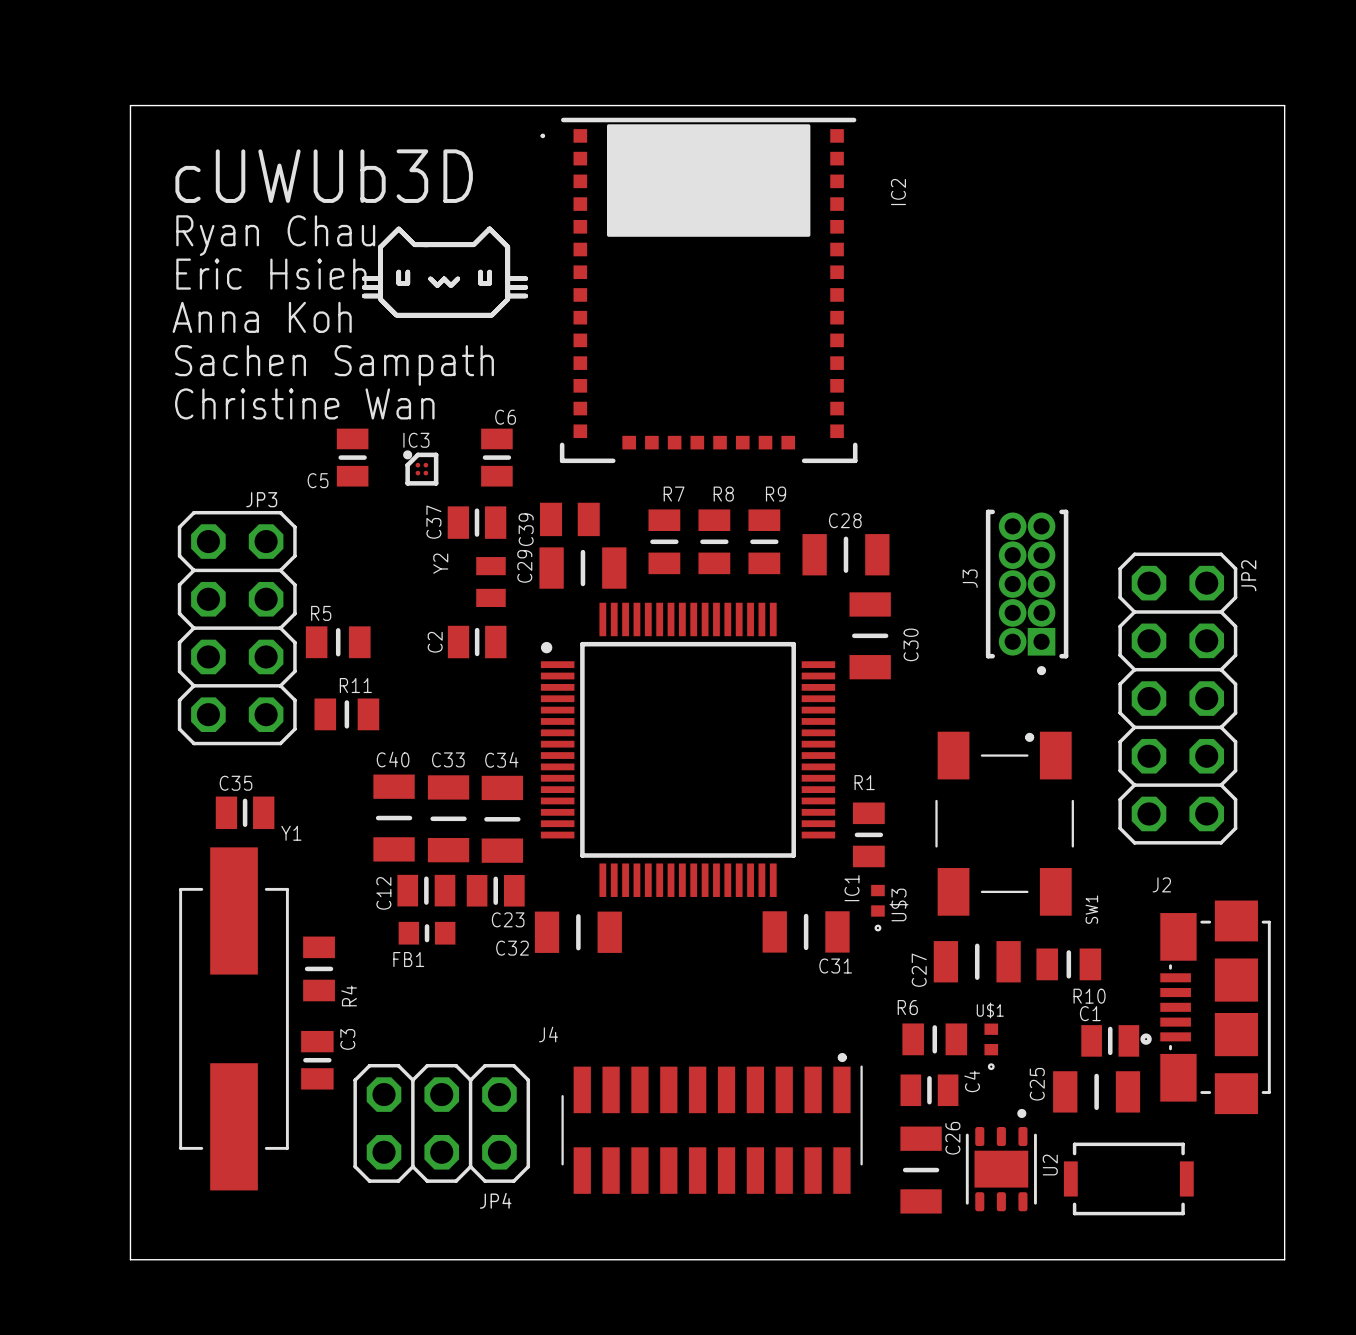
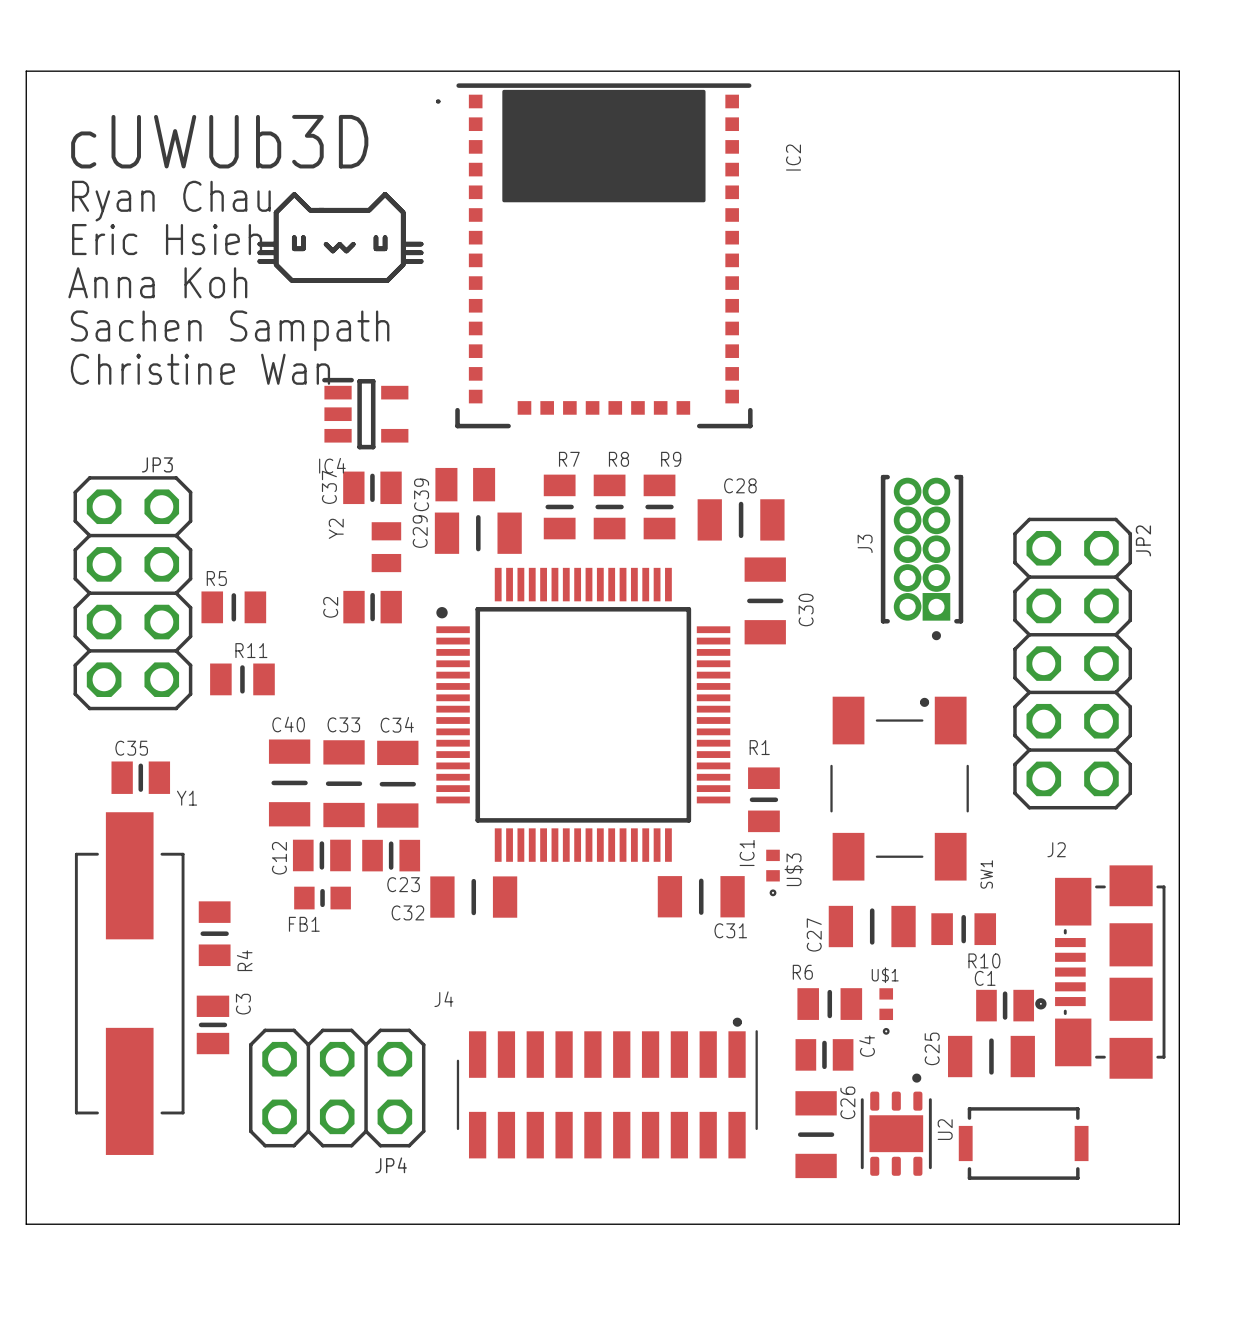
IC4: none -> (365, 413)
C5: (352, 457) -> none
C6: (496, 457) -> none
IC3: (420, 467) -> none

